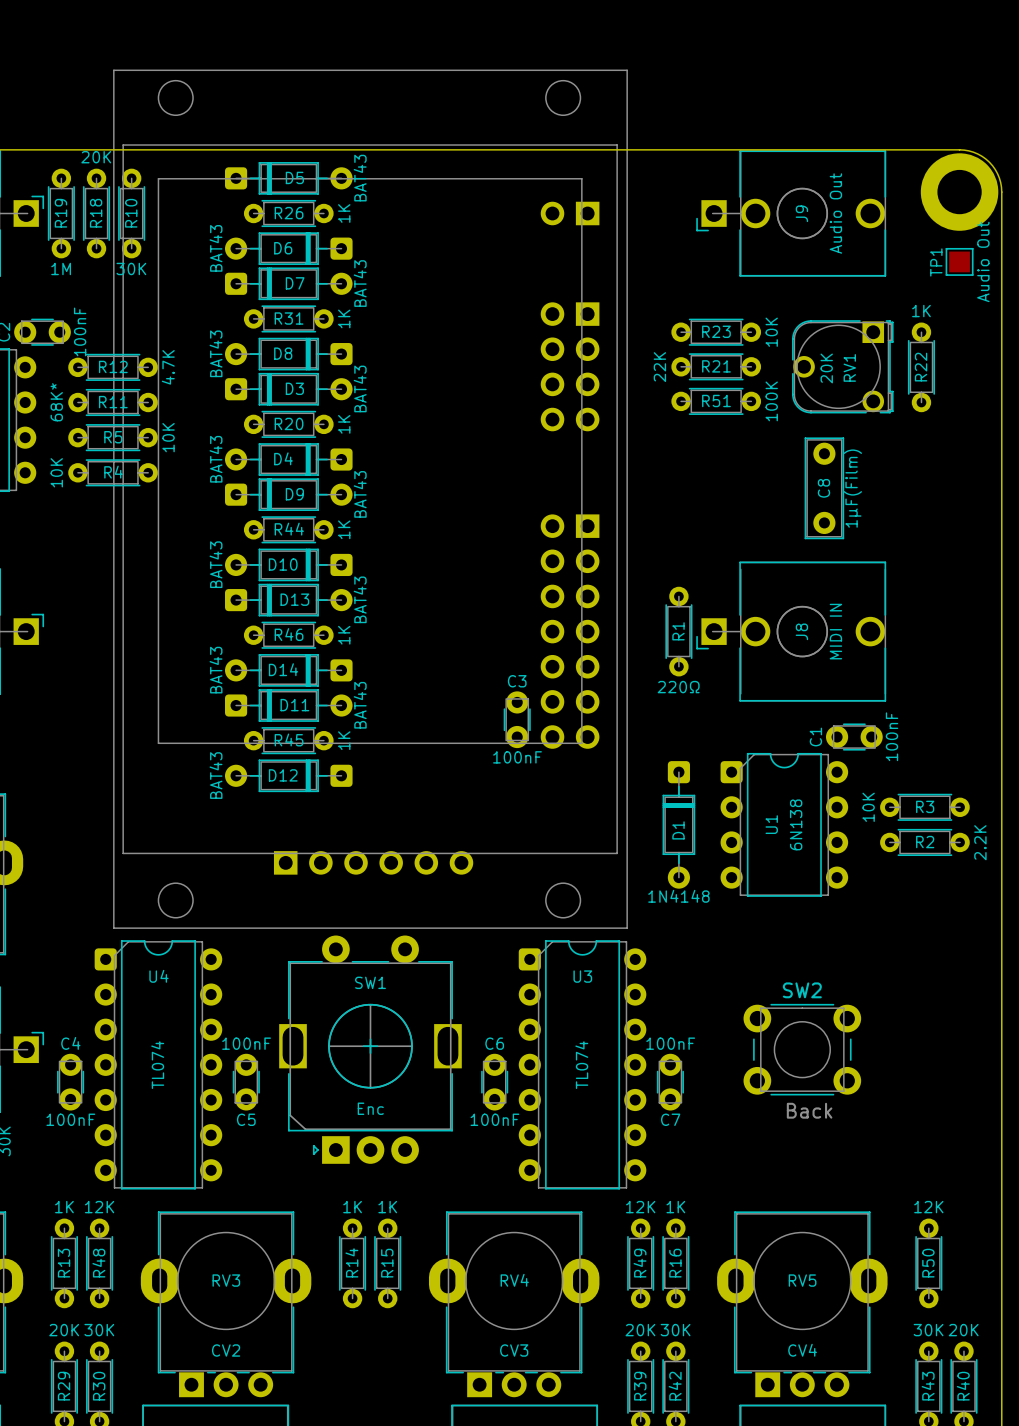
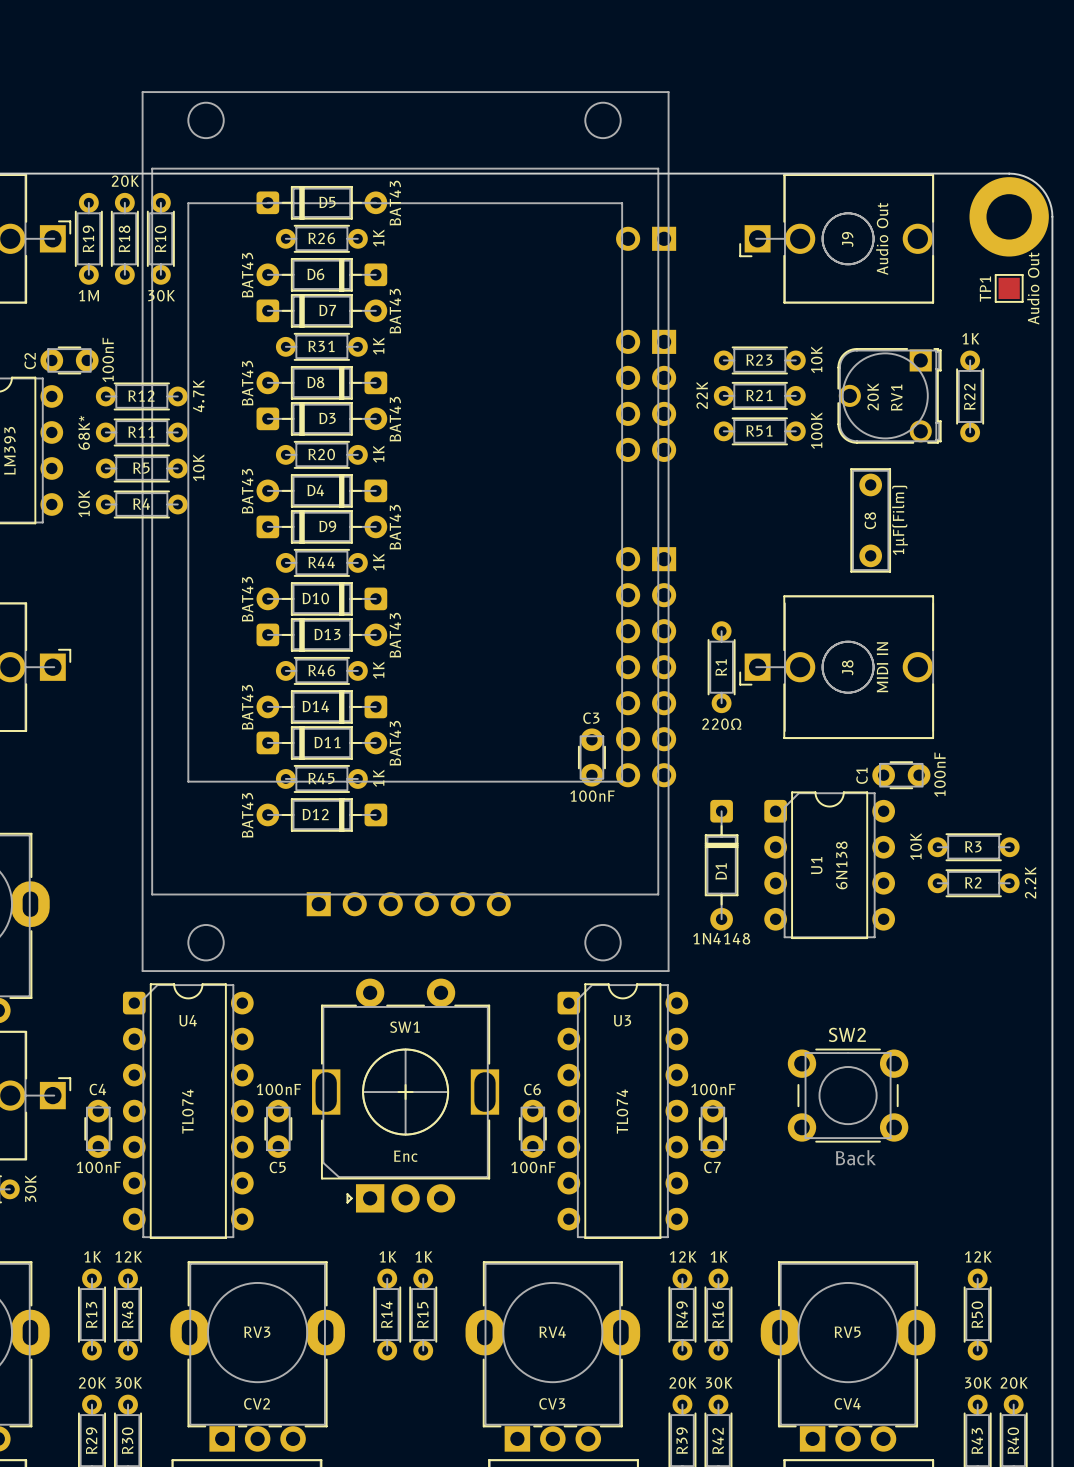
part position: (570, 213) -> (646, 238)
part position: (570, 366) -> (646, 395)
part position: (570, 631) -> (646, 667)
C3 position: (517, 719) -> (591, 757)

